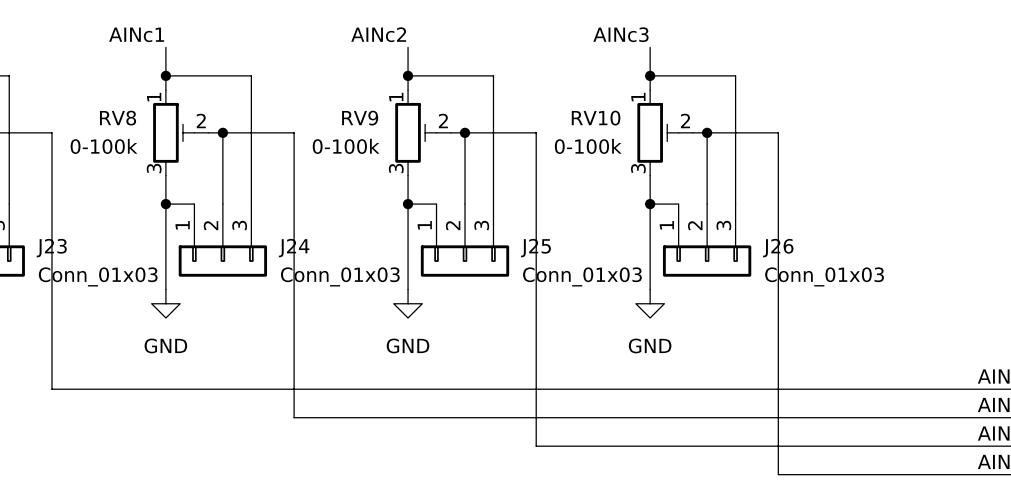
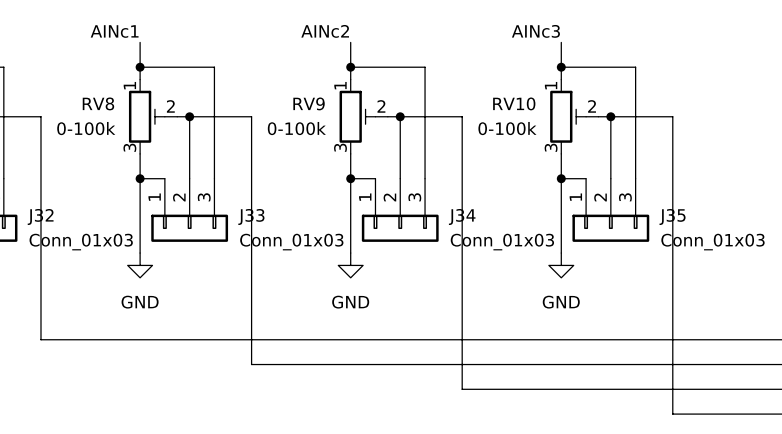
J23 name: J23 (51, 248) -> J32 (40, 216)
J24 name: J24 (294, 248) -> J33 (251, 216)
J25 name: J25 (535, 248) -> J34 (462, 216)
J26 name: J26 (778, 248) -> J35 (672, 216)

